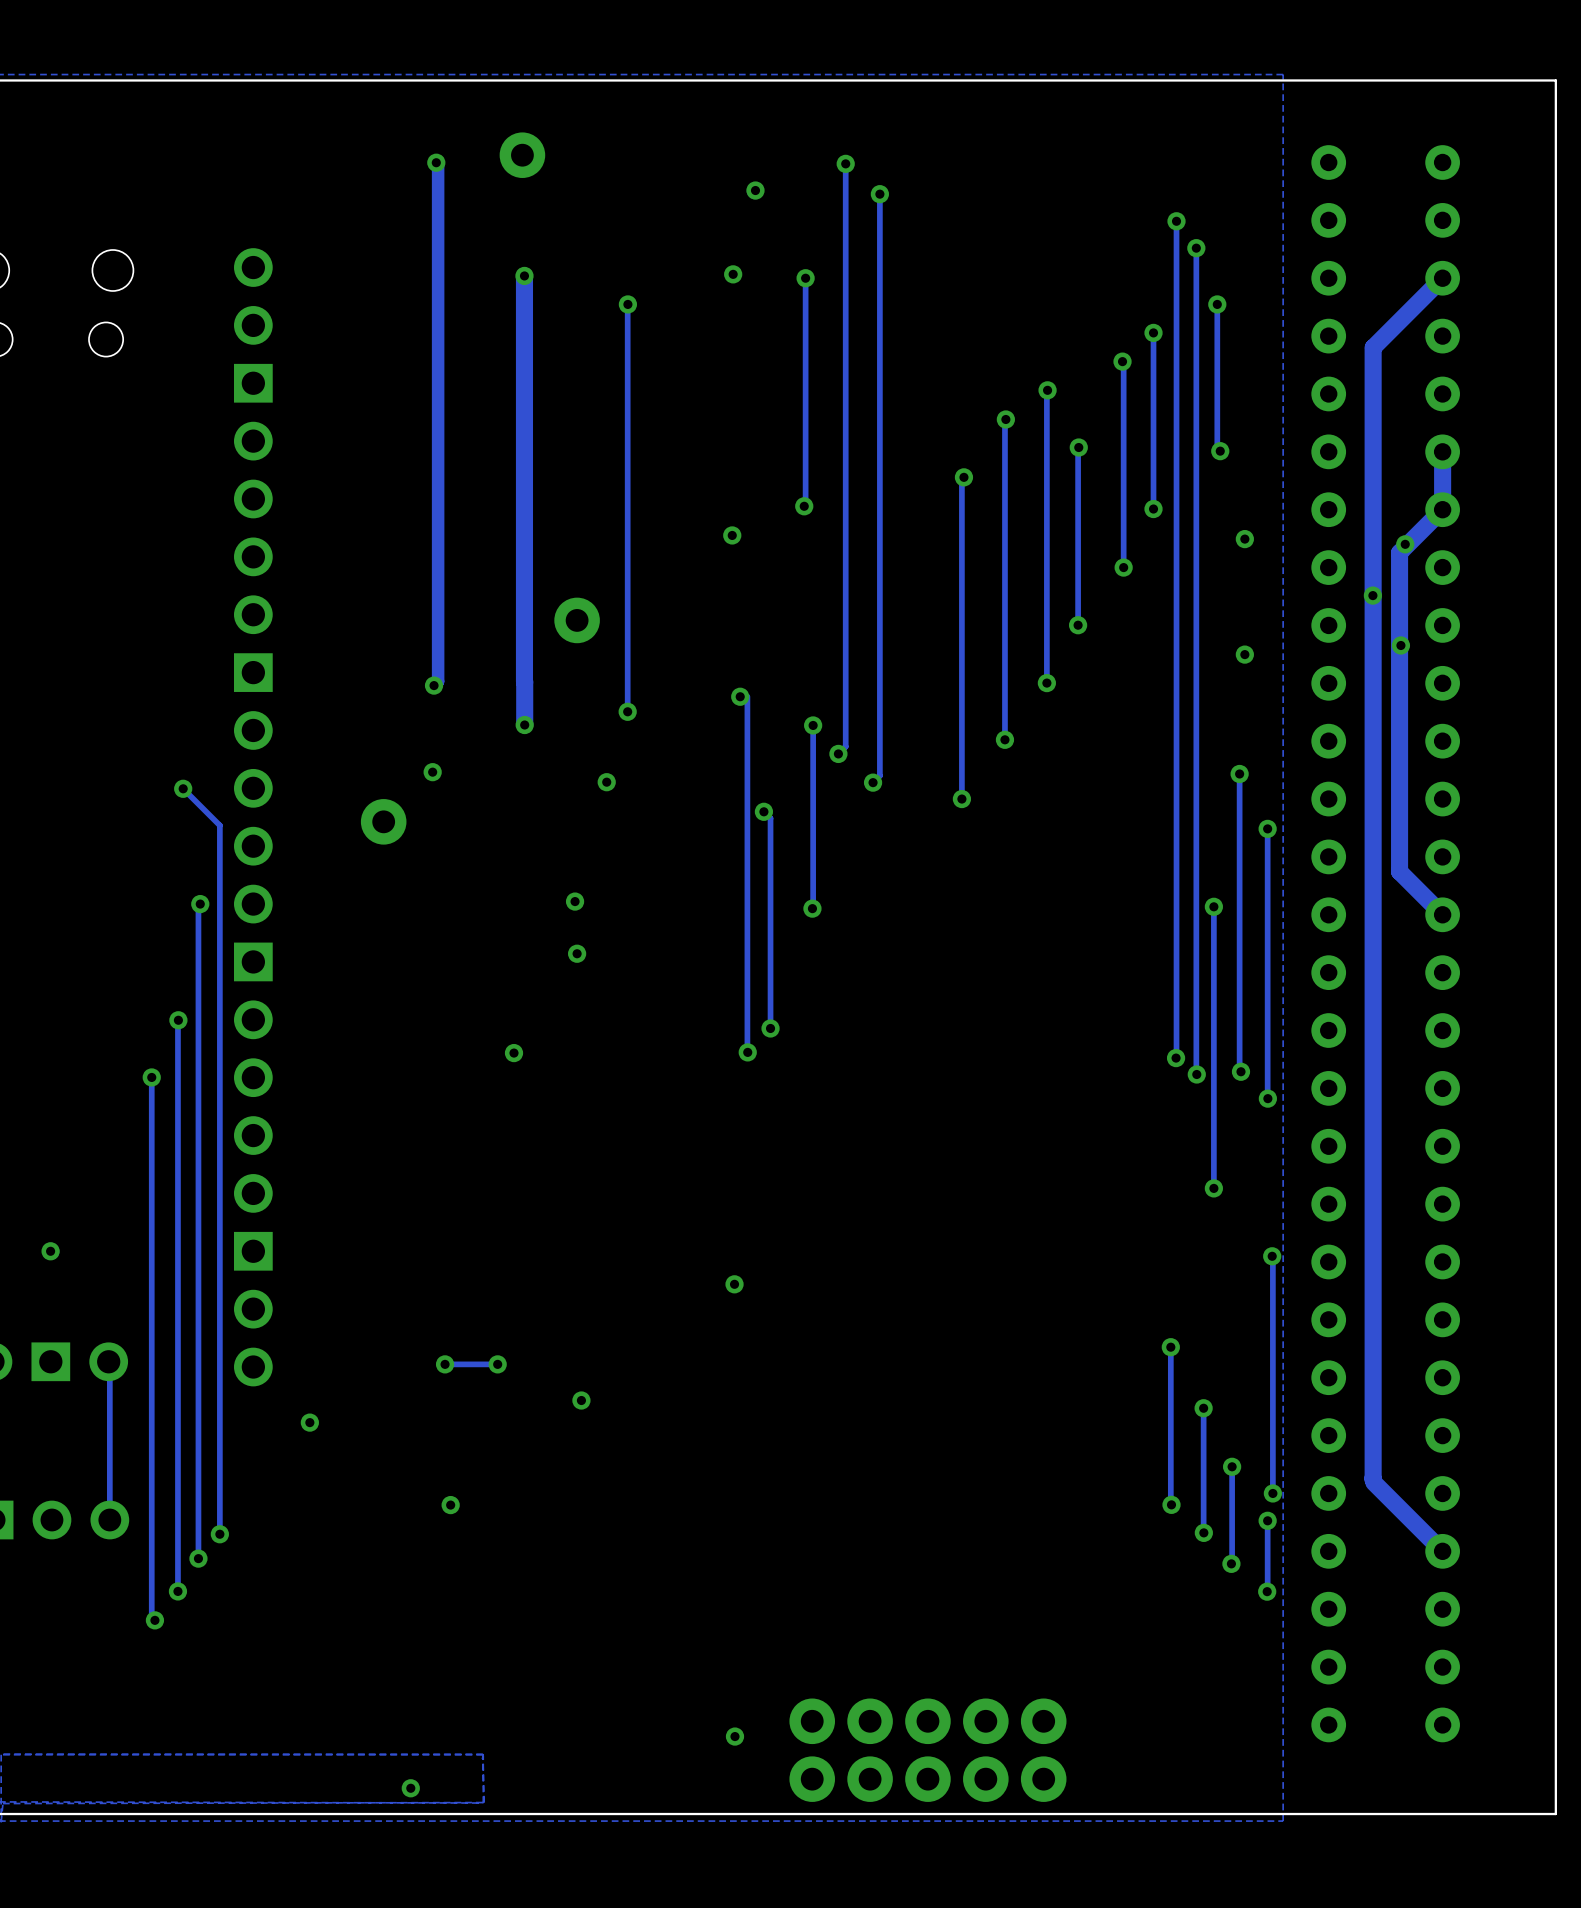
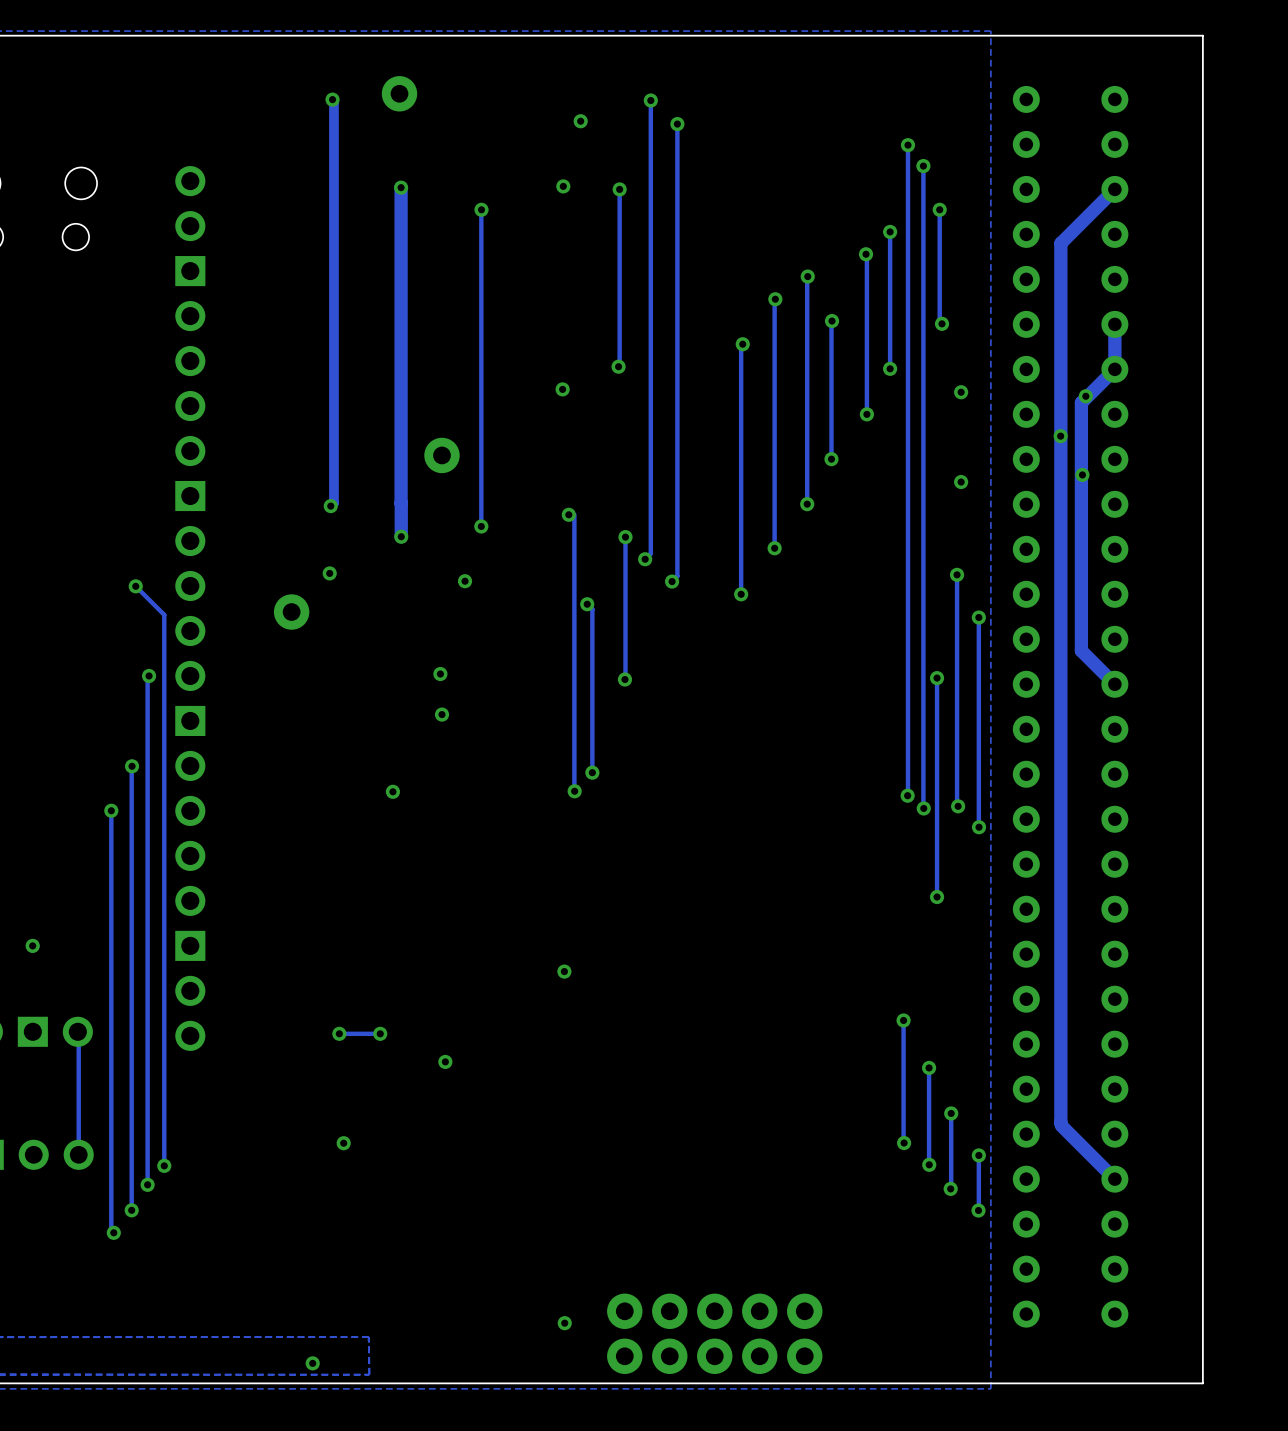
track: (1272, 1256) (1272, 1493) -> none
via: (1272, 1256) -> none
via: (309, 1422) -> none
via: (1272, 1493) -> none

